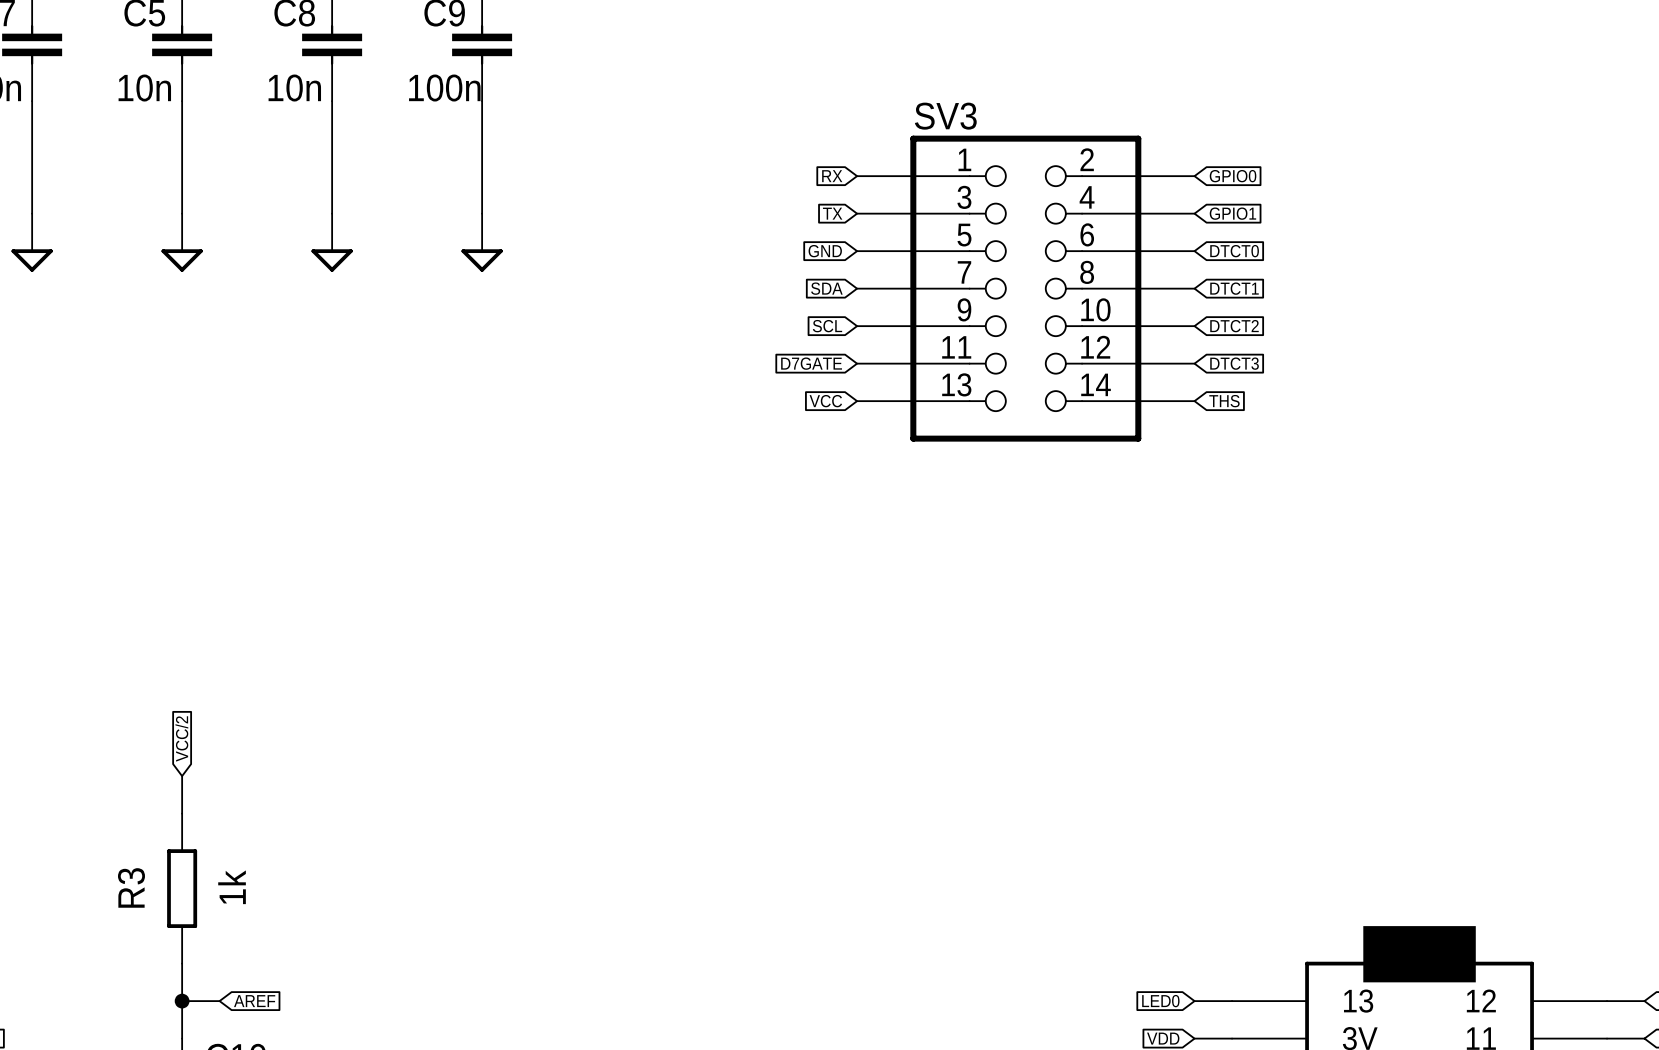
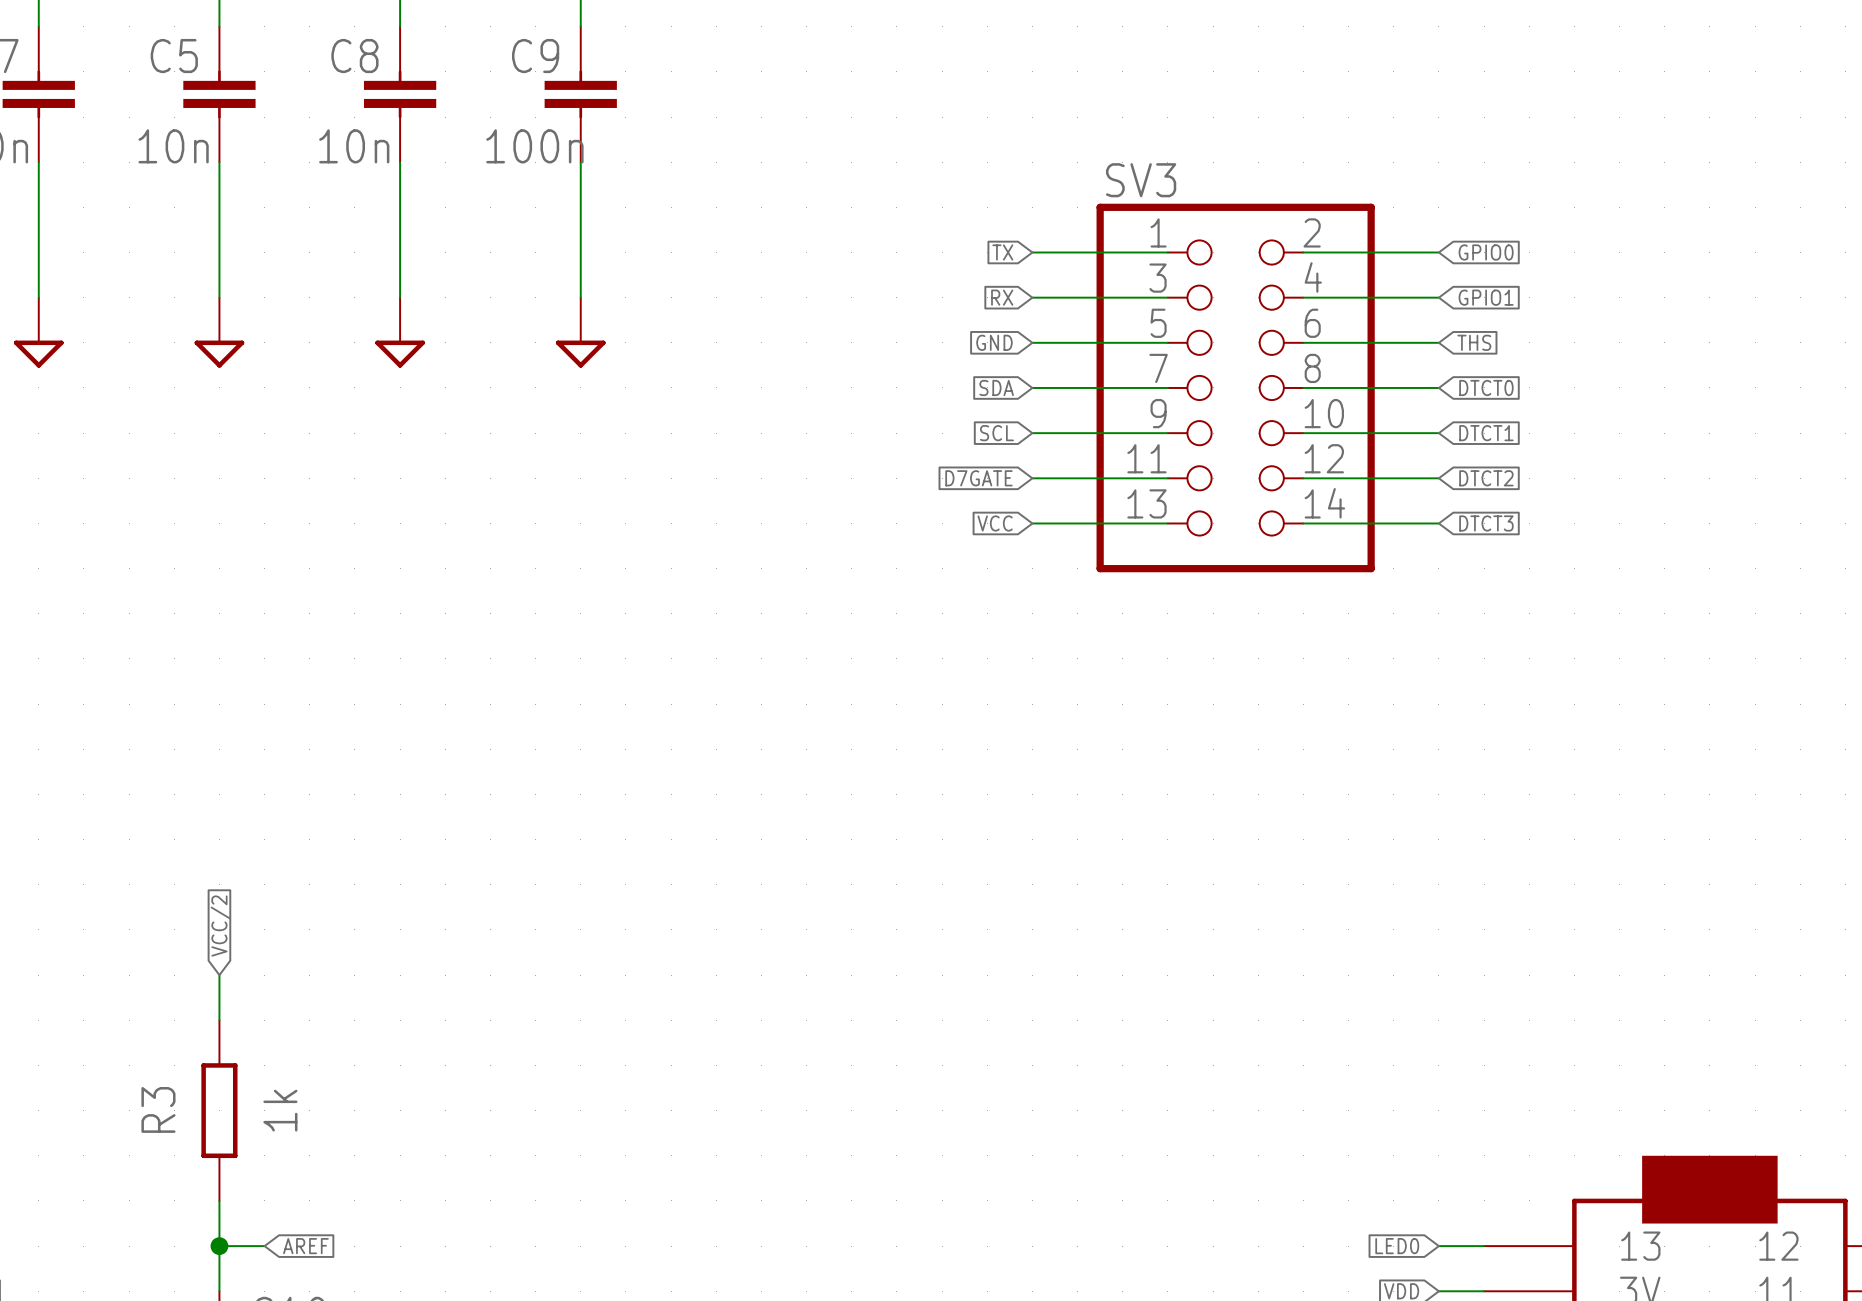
global label: RX (832, 176) -> TX (1002, 252)
global label: TX (832, 213) -> RX (1002, 297)
global label: DTCT0 (1234, 251) -> THS (1474, 342)
global label: DTCT1 (1234, 288) -> DTCT0 (1486, 387)
global label: DTCT2 (1234, 326) -> DTCT1 (1486, 433)
global label: DTCT3 (1234, 363) -> DTCT2 (1486, 478)
global label: THS (1224, 401) -> DTCT3 (1486, 523)

